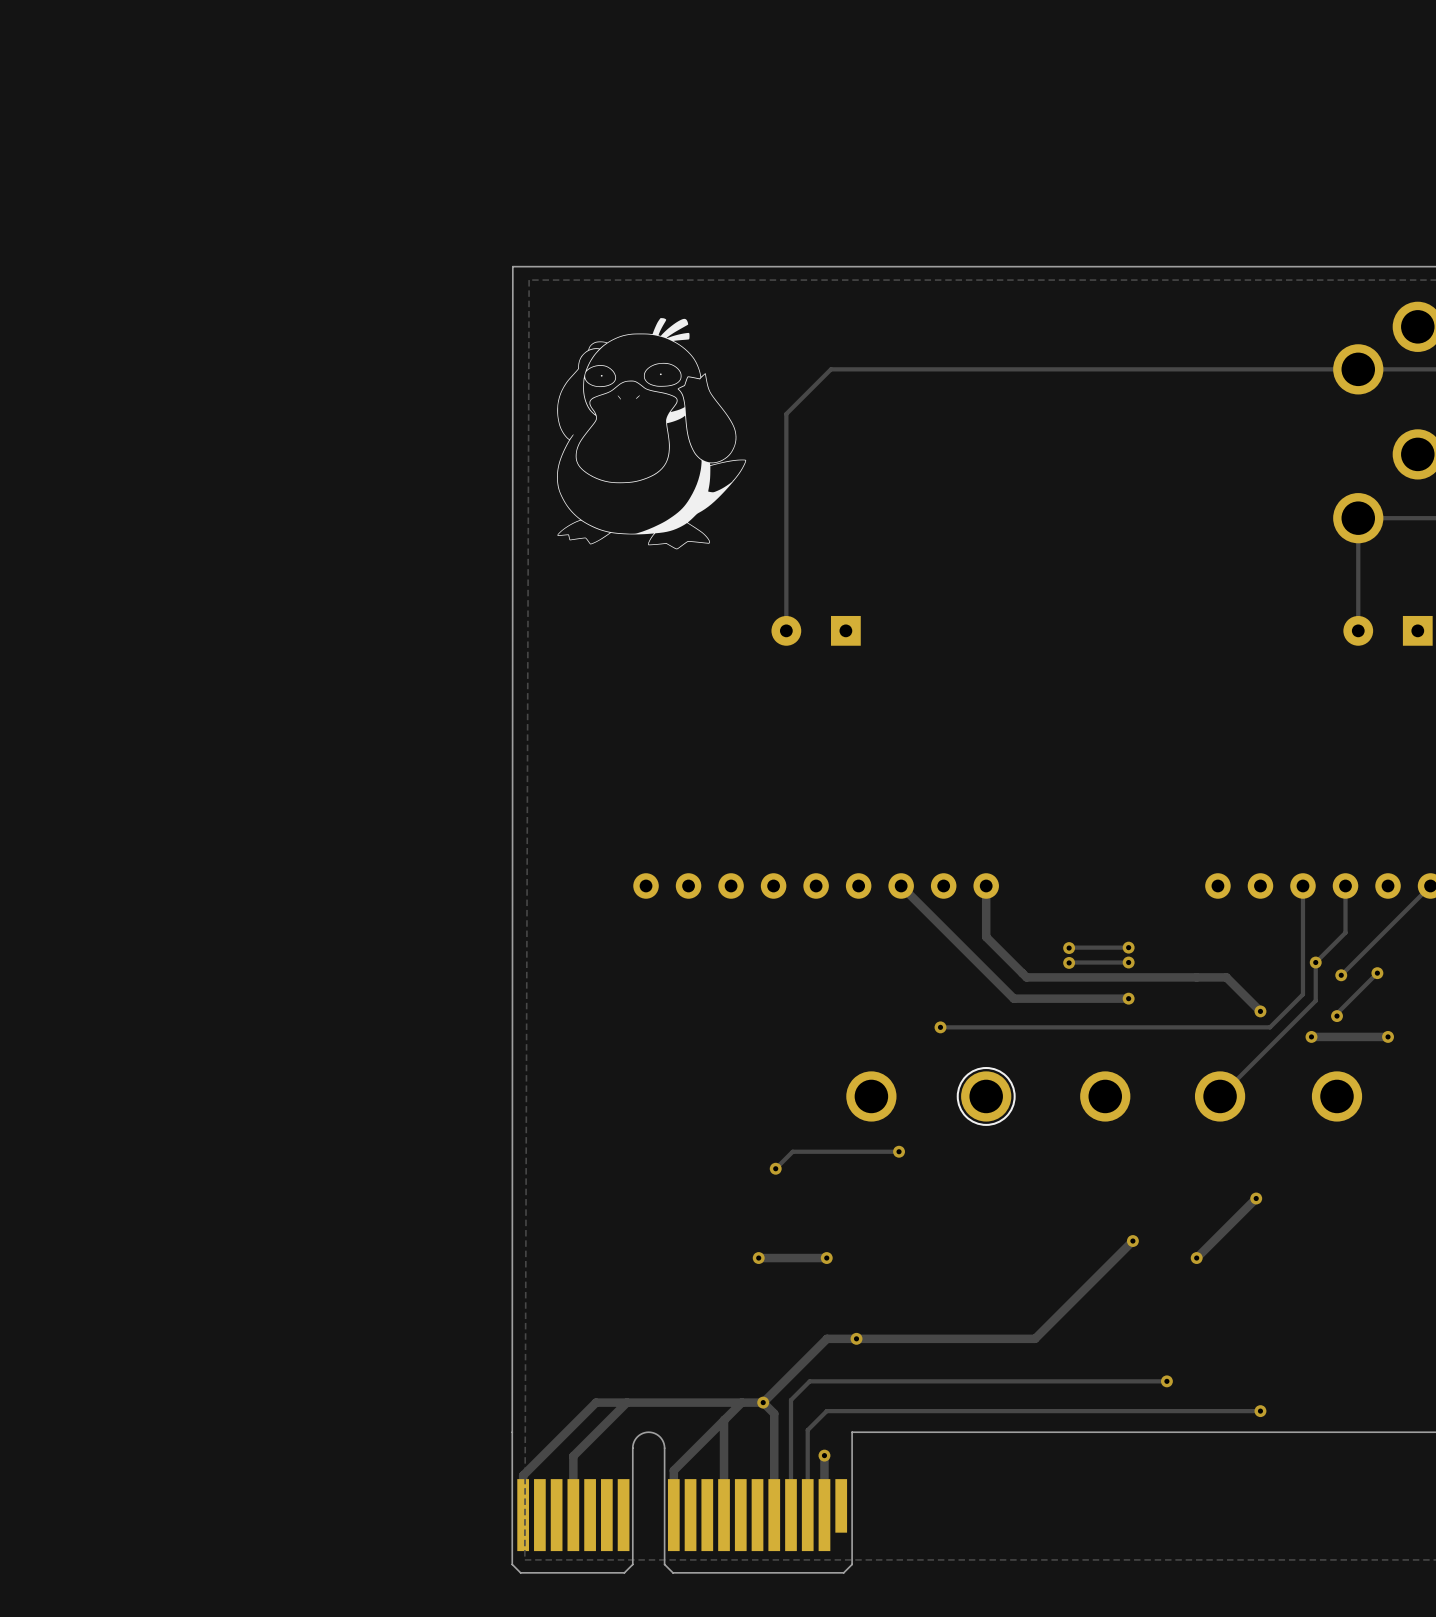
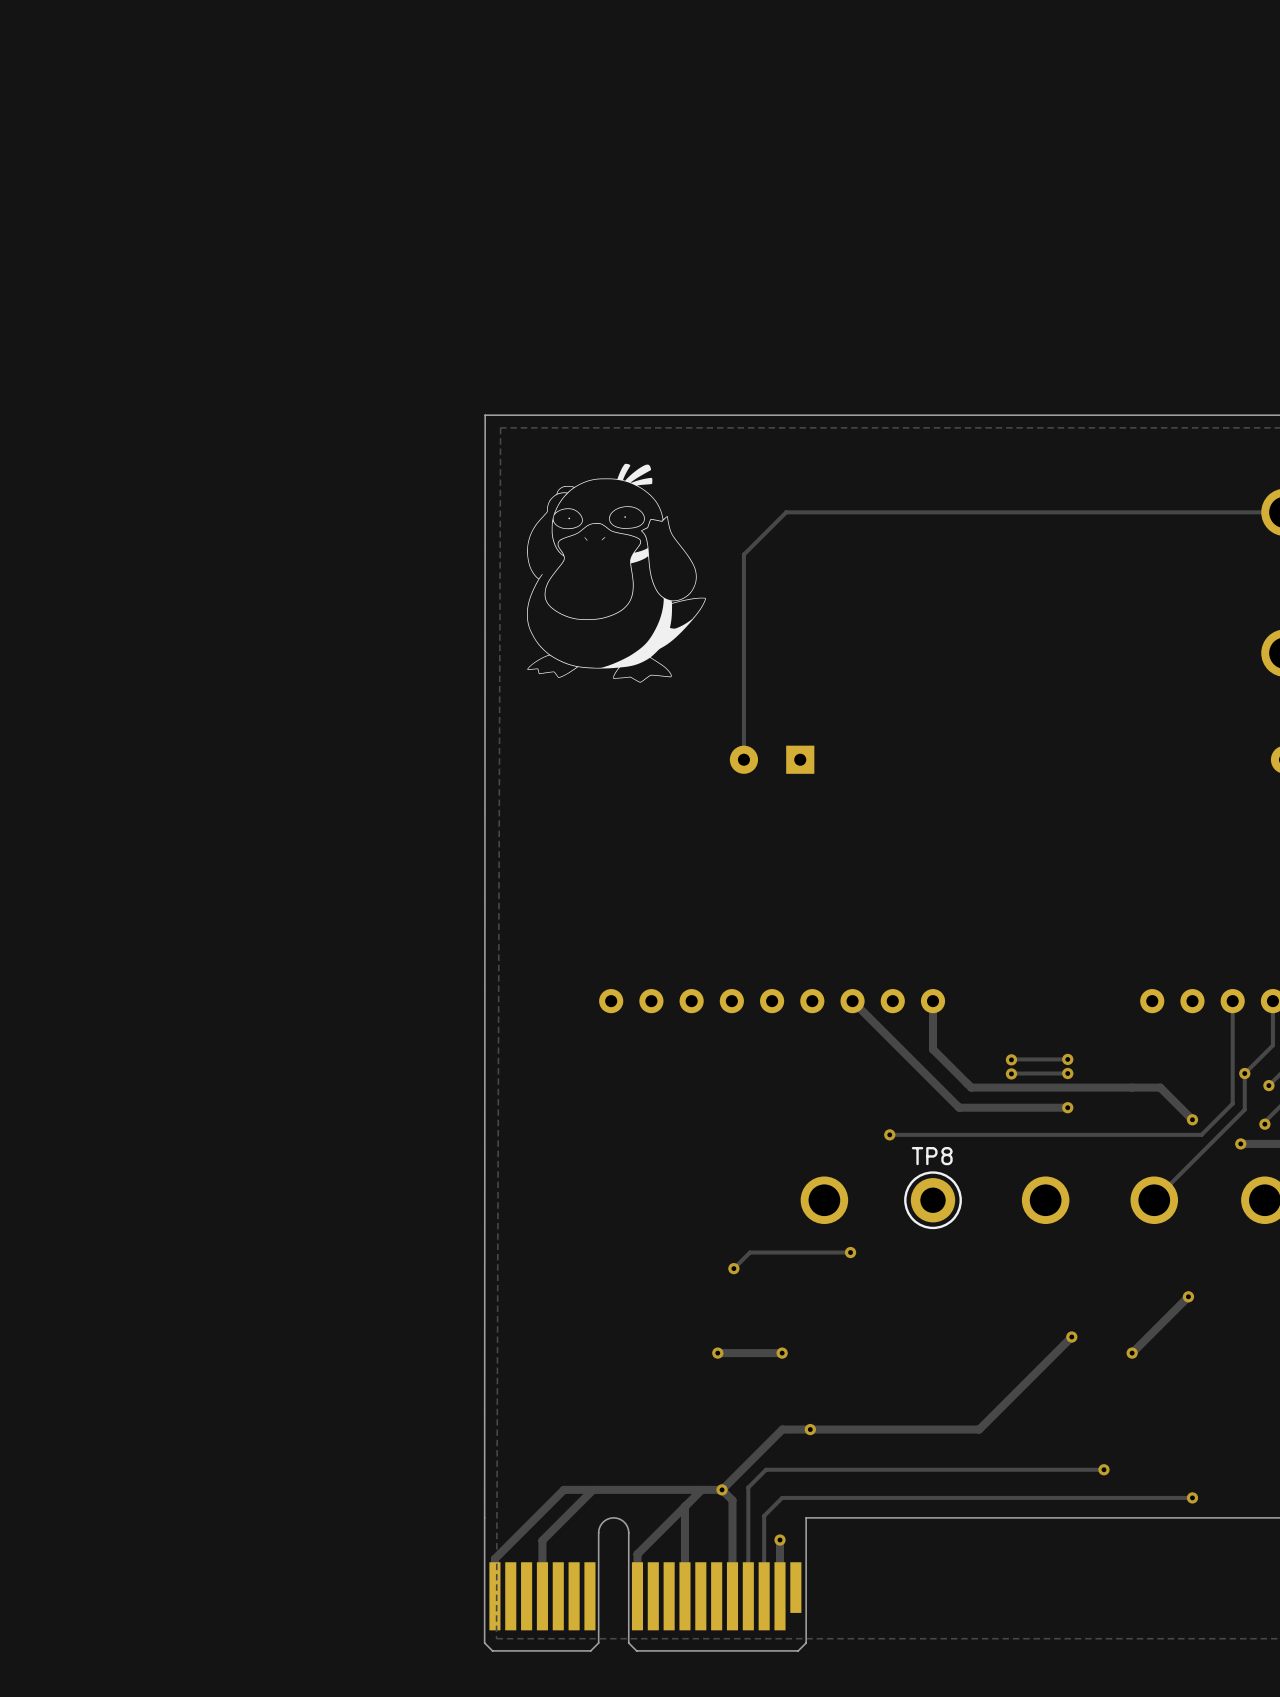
part: (986, 1096) -> none
TP8: none -> (933, 1200)

